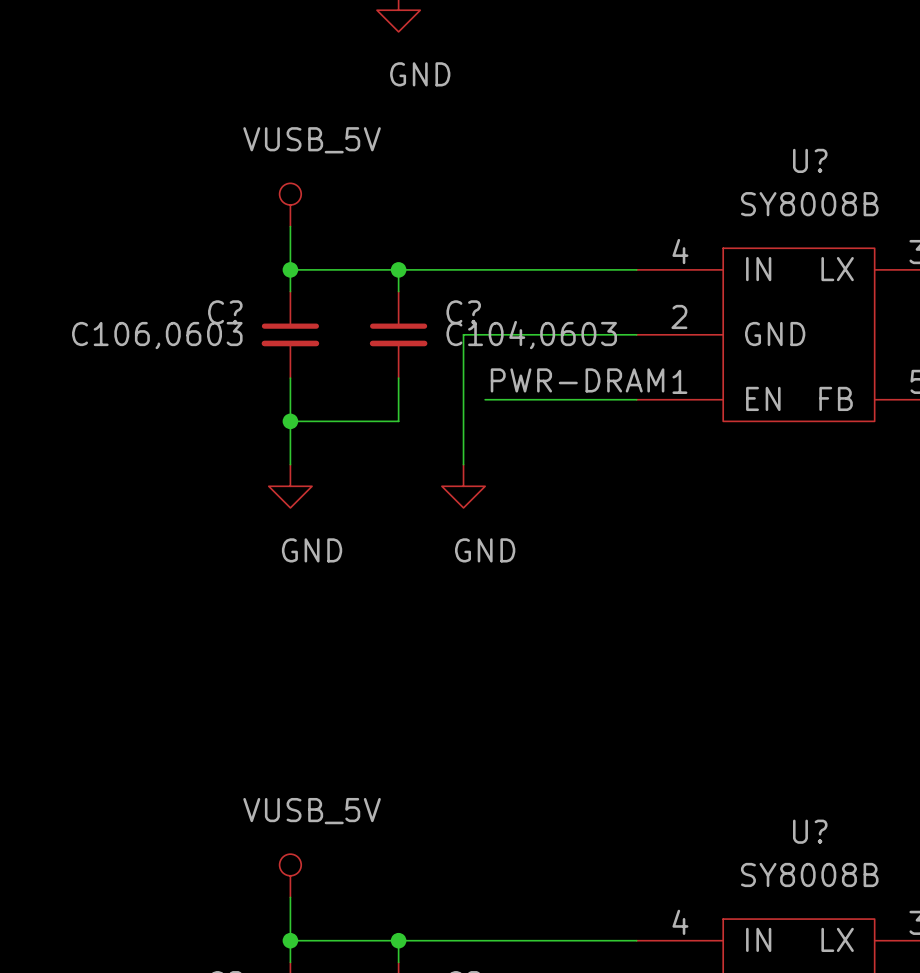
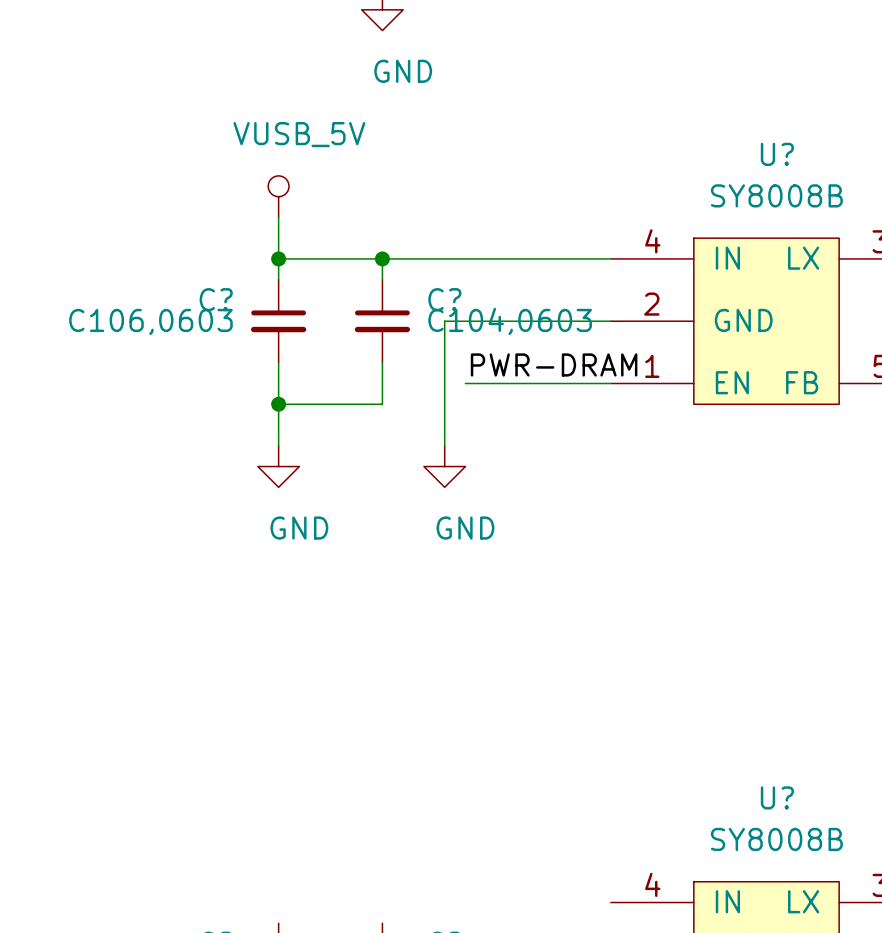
power symbol: VUSB_5V (290, 875) -> none
wire: (290, 897) (290, 962) -> none
wire: (290, 940) (636, 940) -> none
junction: (290, 940) -> none
wire: (398, 940) (398, 962) -> none
junction: (398, 940) -> none

